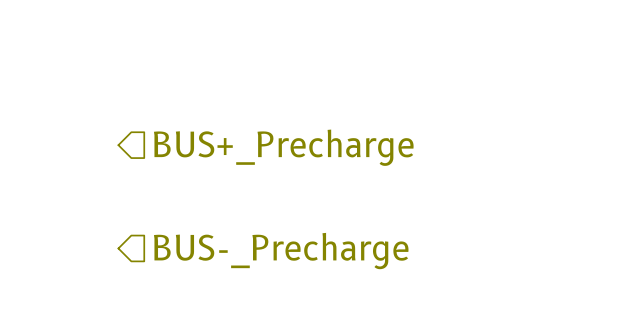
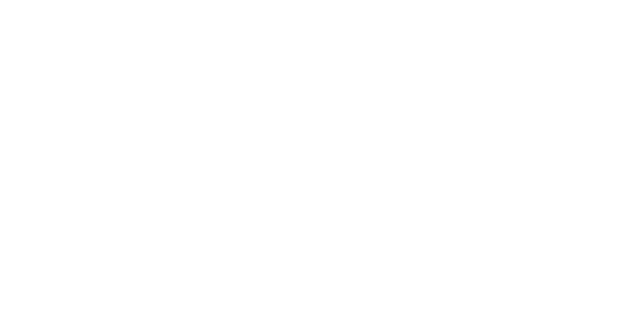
hierarchical label: BUS+_Precharge (283, 147) -> none
hierarchical label: BUS-_Precharge (281, 251) -> none

